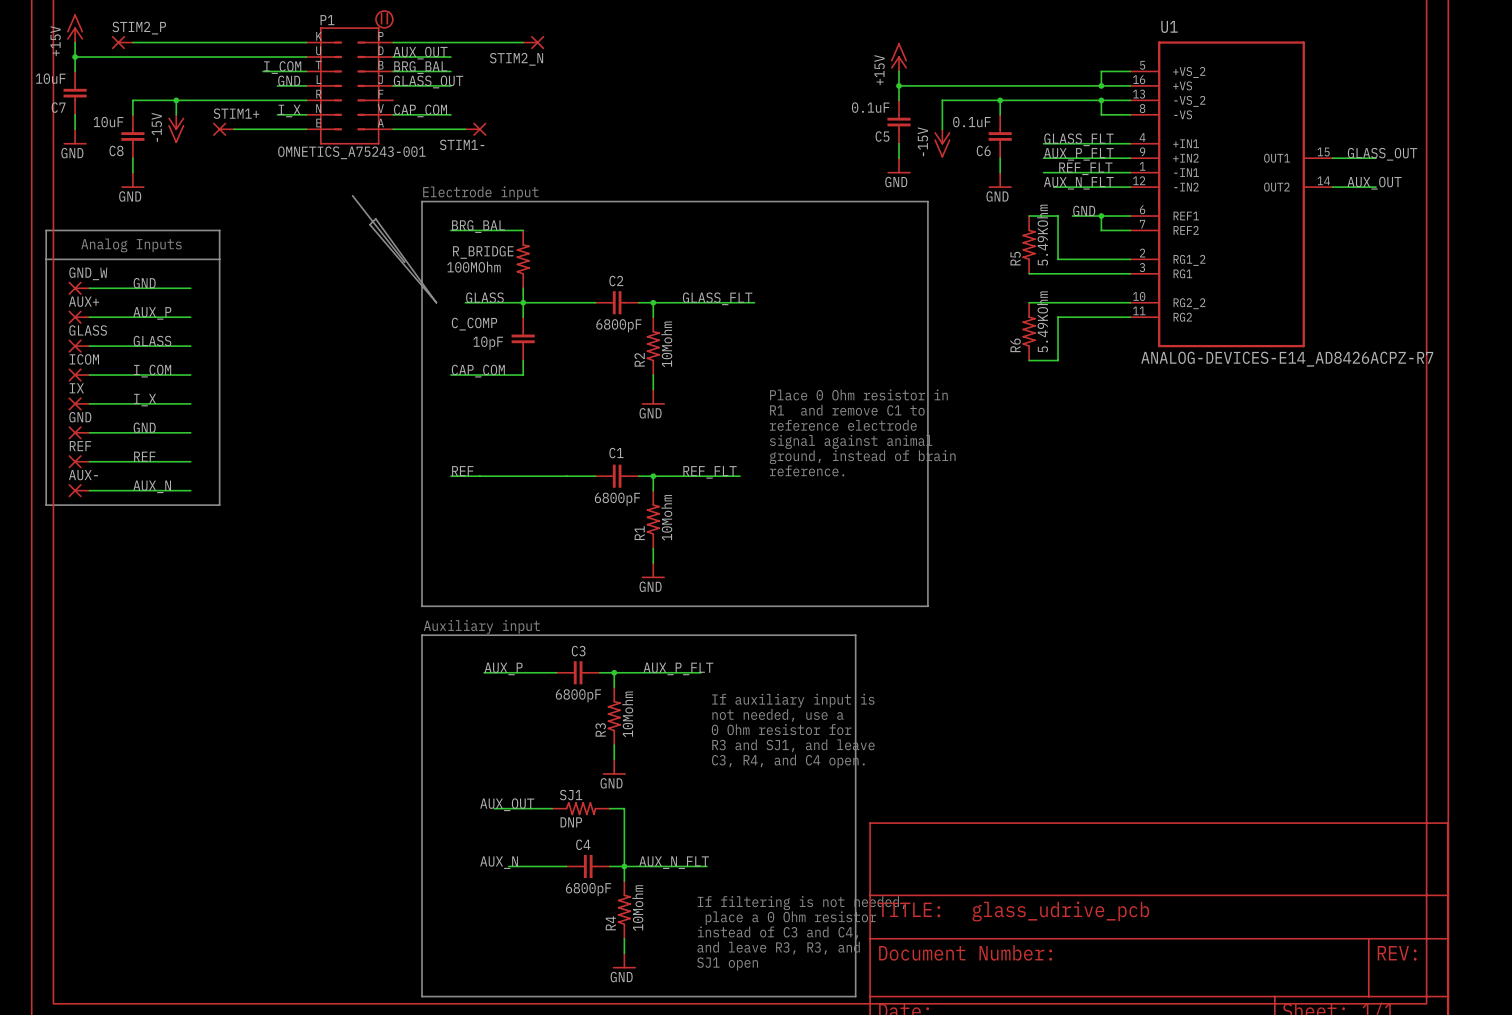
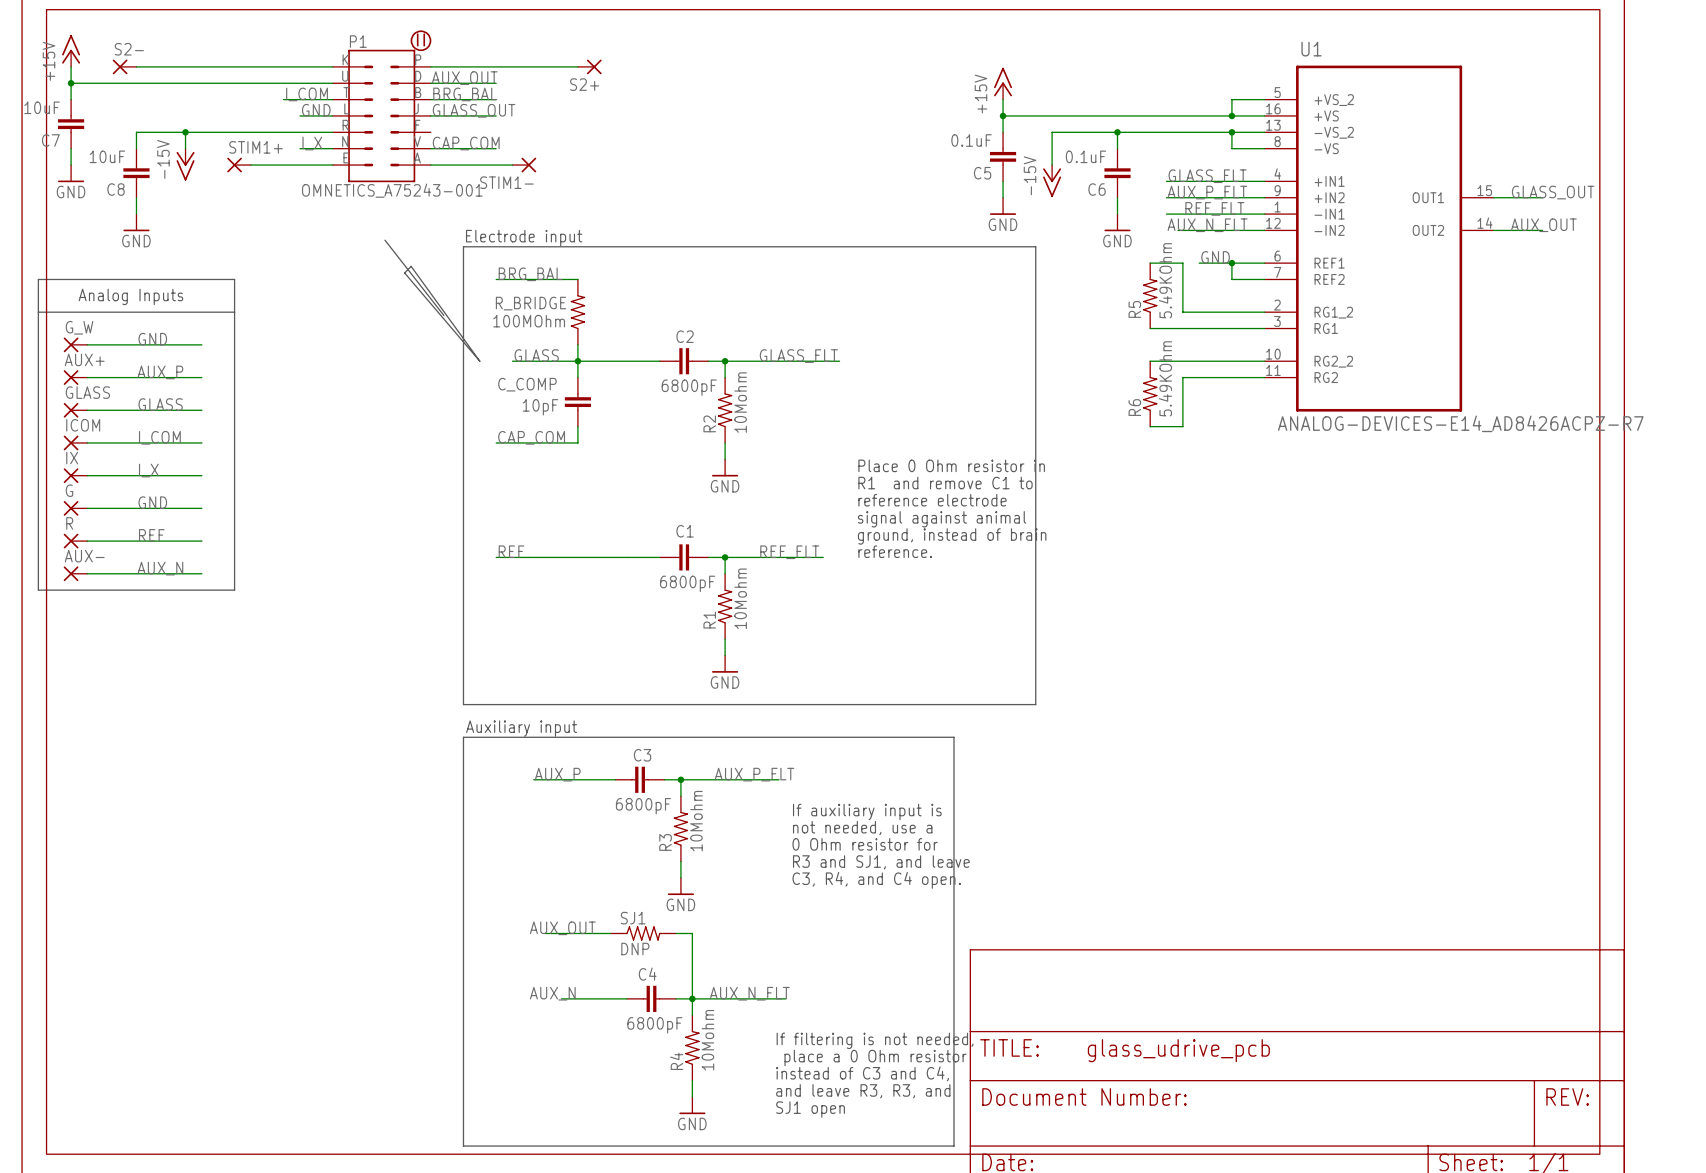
STIM2_P name: STIM2_P (139, 28) -> S2- (129, 49)
STIM2_N name: STIM2_N (516, 59) -> S2+ (584, 84)
GND_W name: GND_W (88, 273) -> G_W (79, 327)
GND name: GND (80, 417) -> G (69, 490)
REF name: REF (80, 446) -> R (69, 523)

